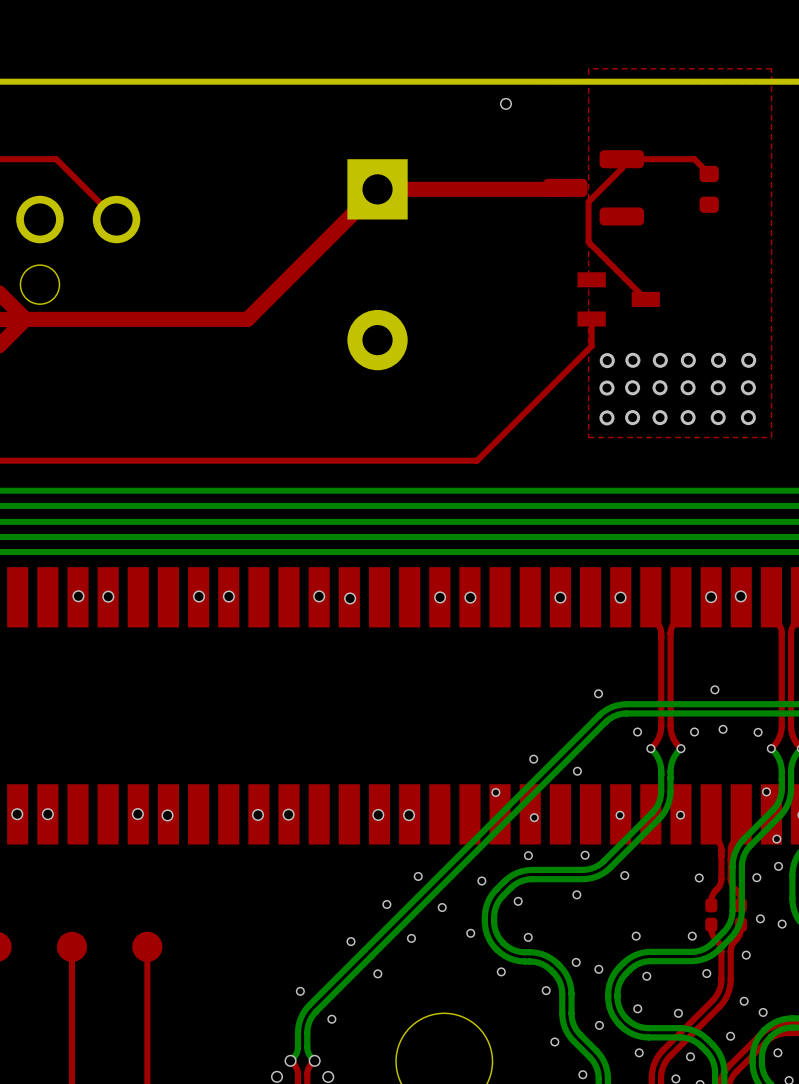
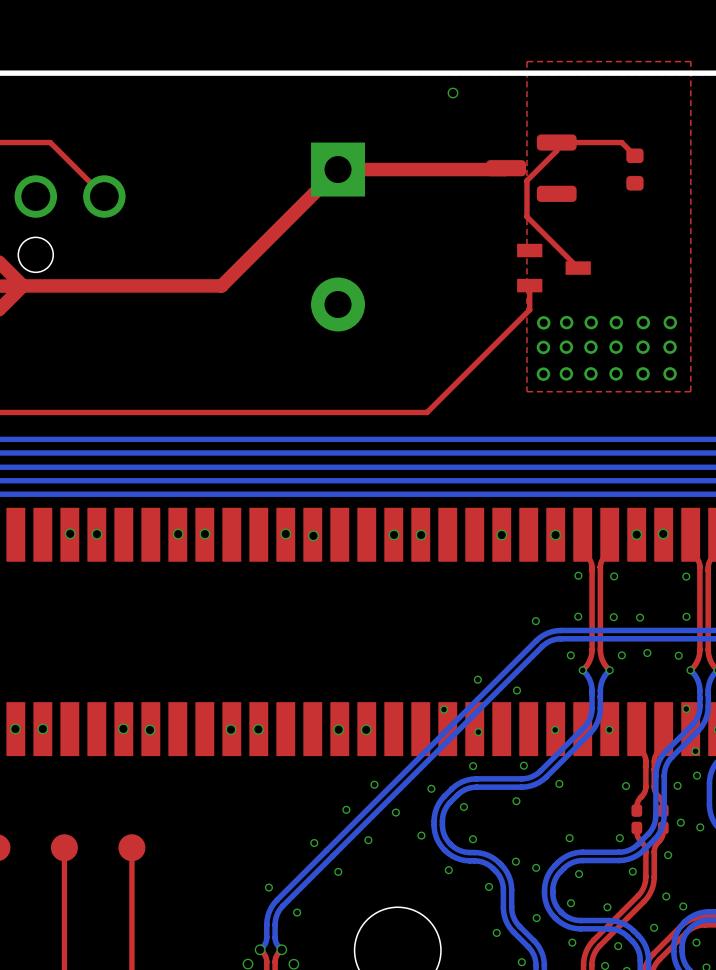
via: none -> (578, 575)
via: none -> (614, 576)
via: none -> (686, 576)
via: none -> (578, 616)
via: none -> (686, 616)
via: none -> (613, 617)

